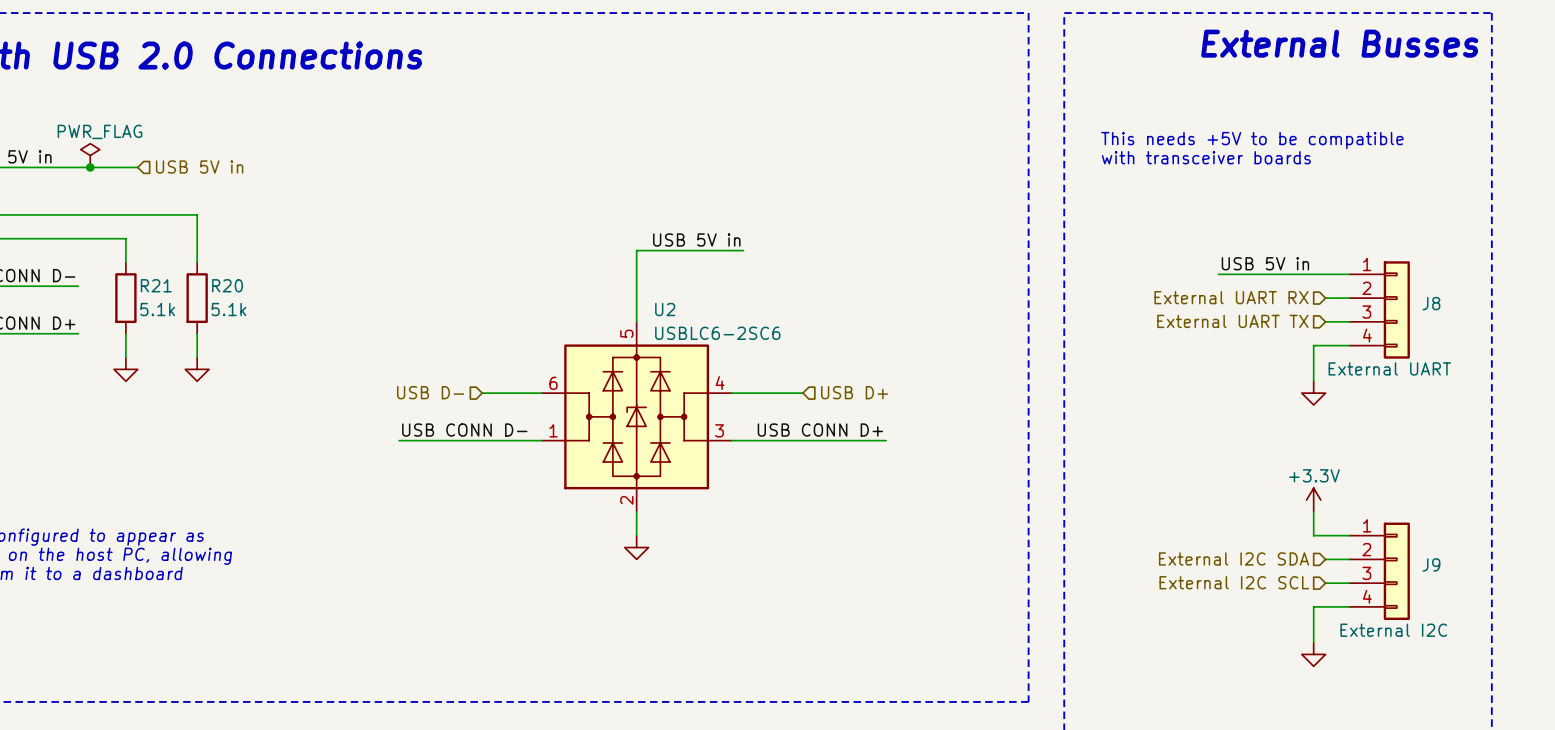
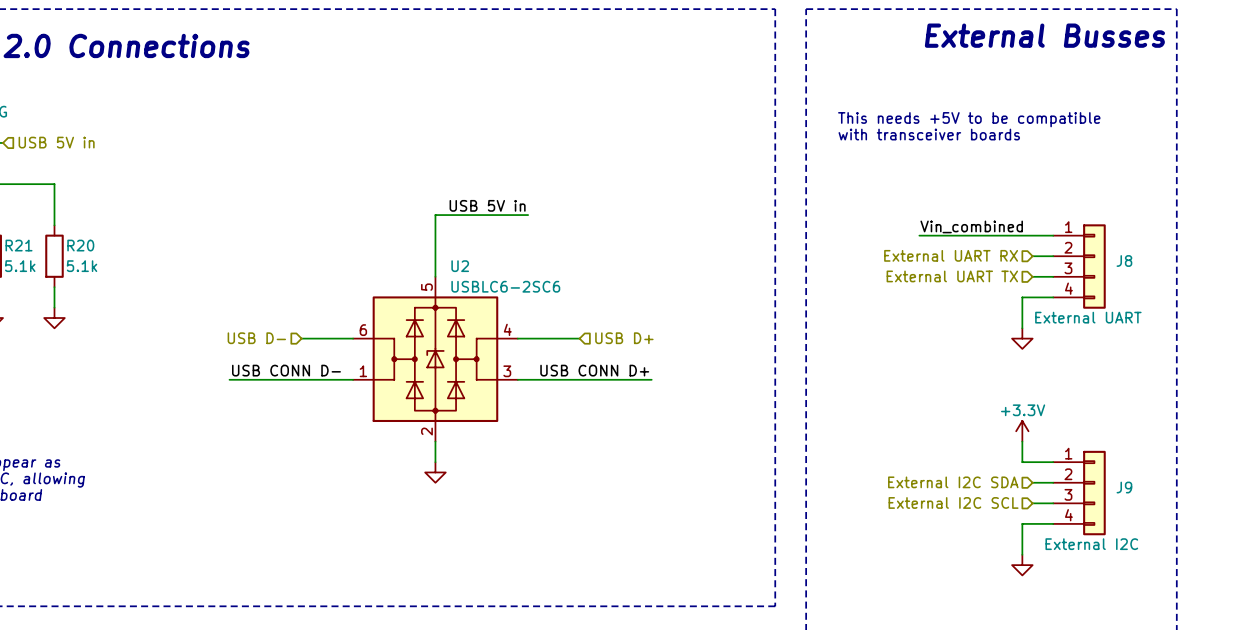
label: USB 5V in (1265, 263) -> none
label: none -> Vin_combined (971, 226)
wire: none -> (919, 235) (939, 235)

